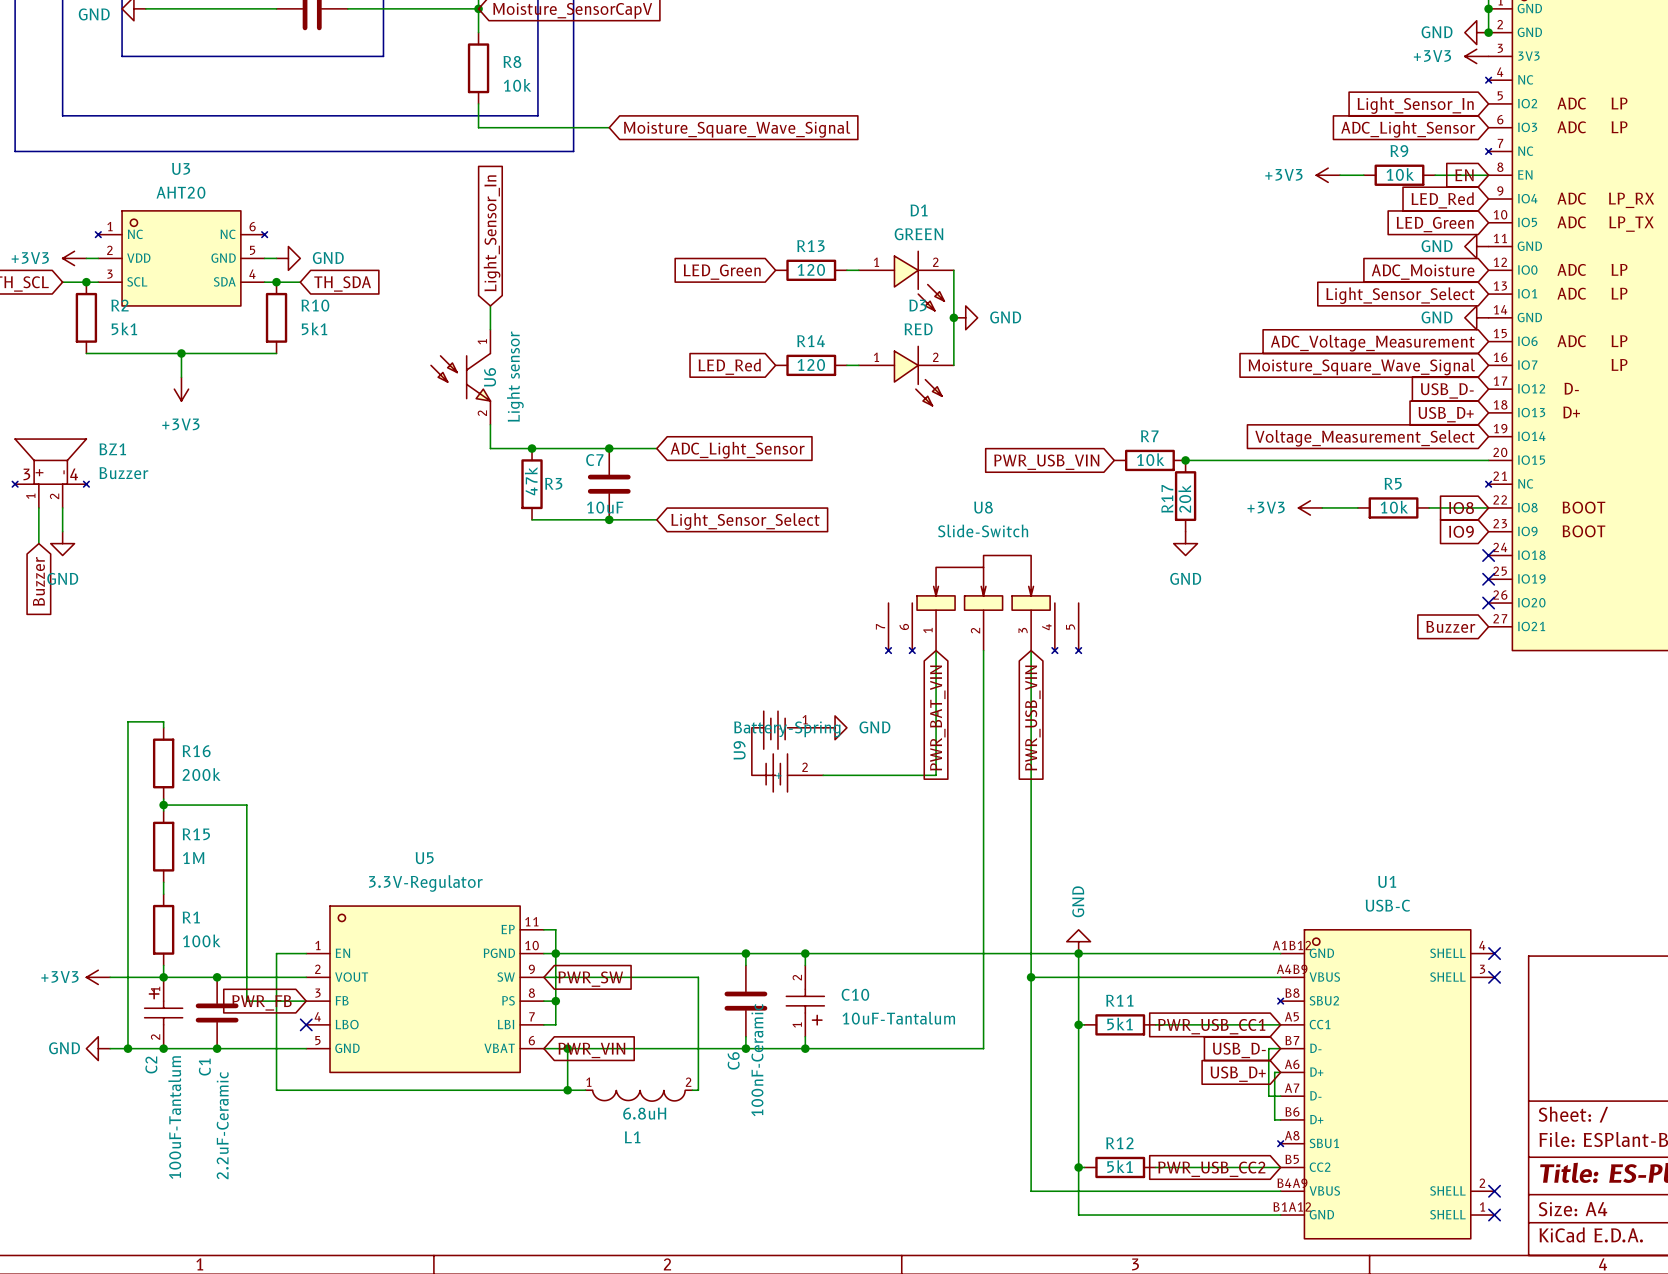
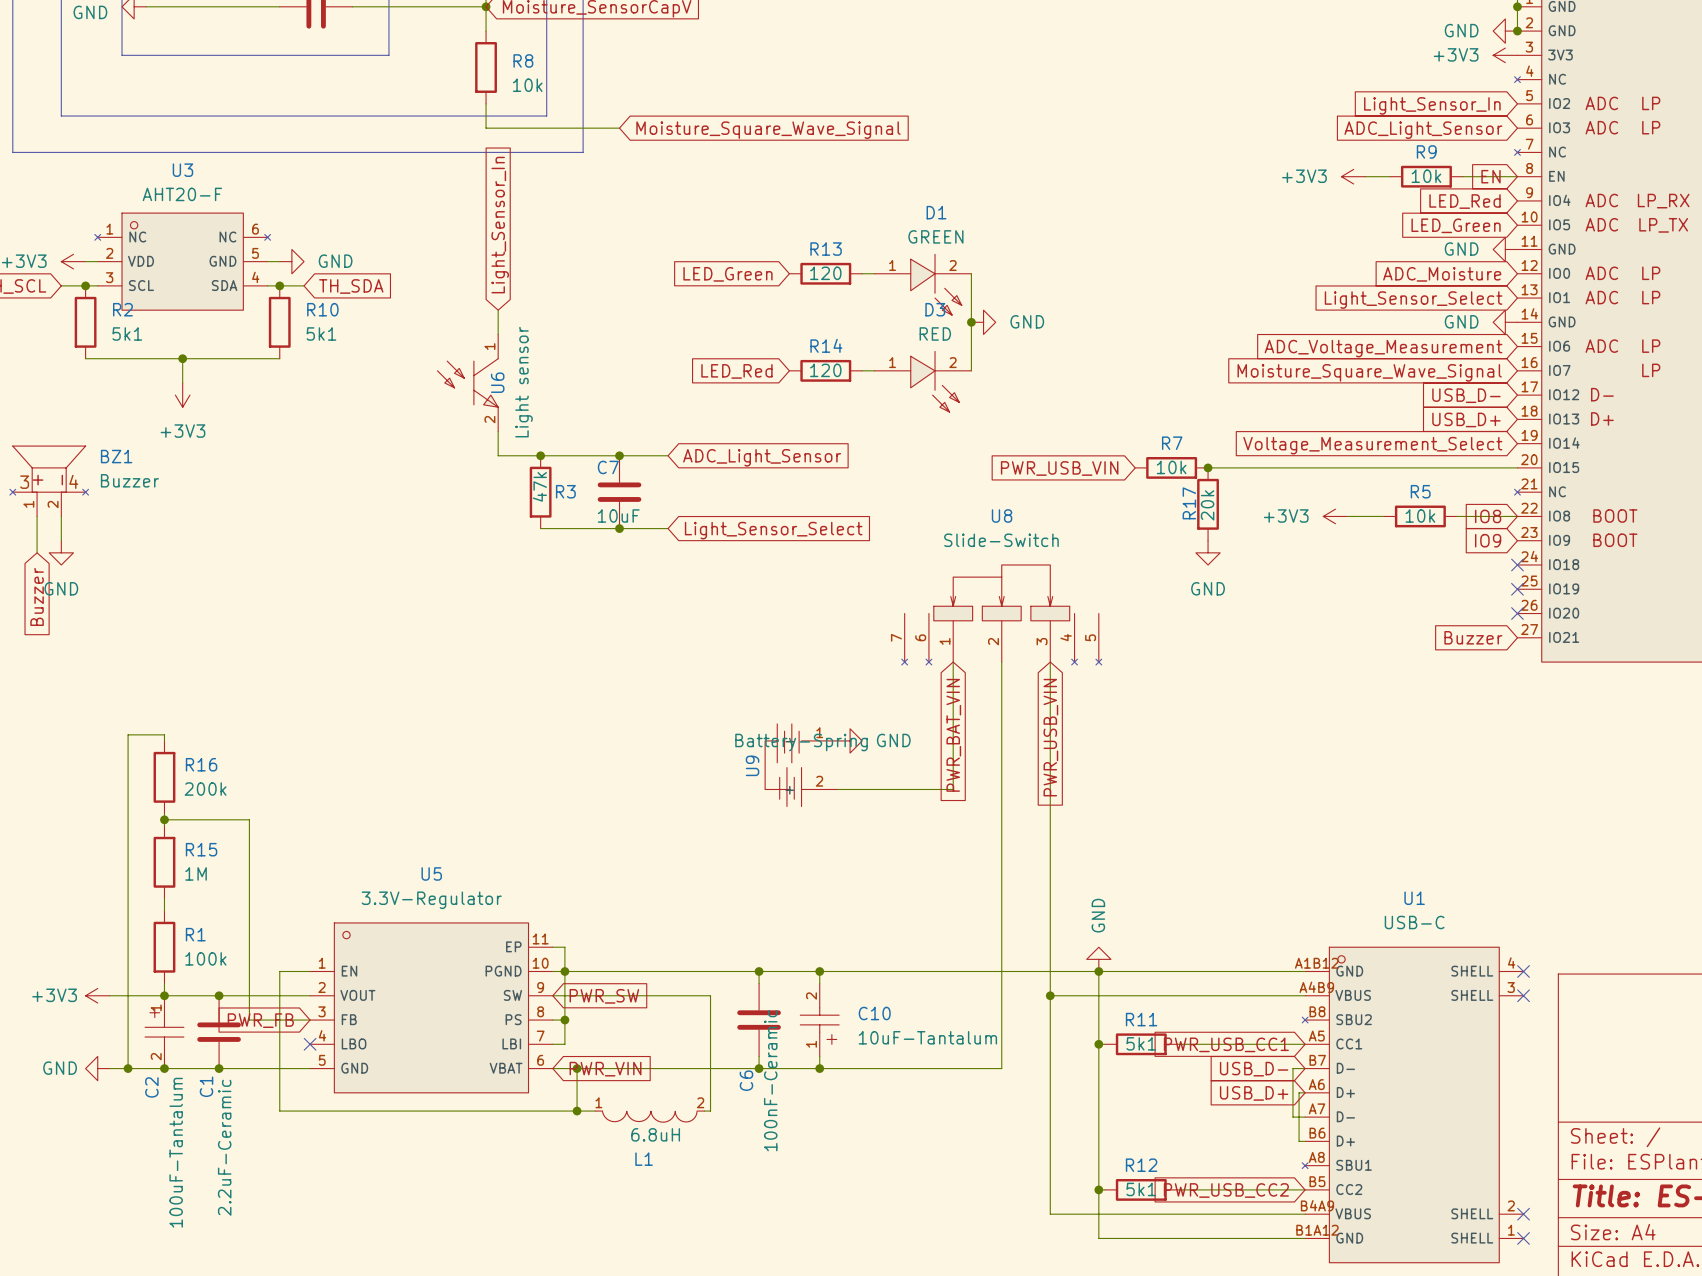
U3 value: AHT20 (180, 192) -> AHT20-F (182, 194)

